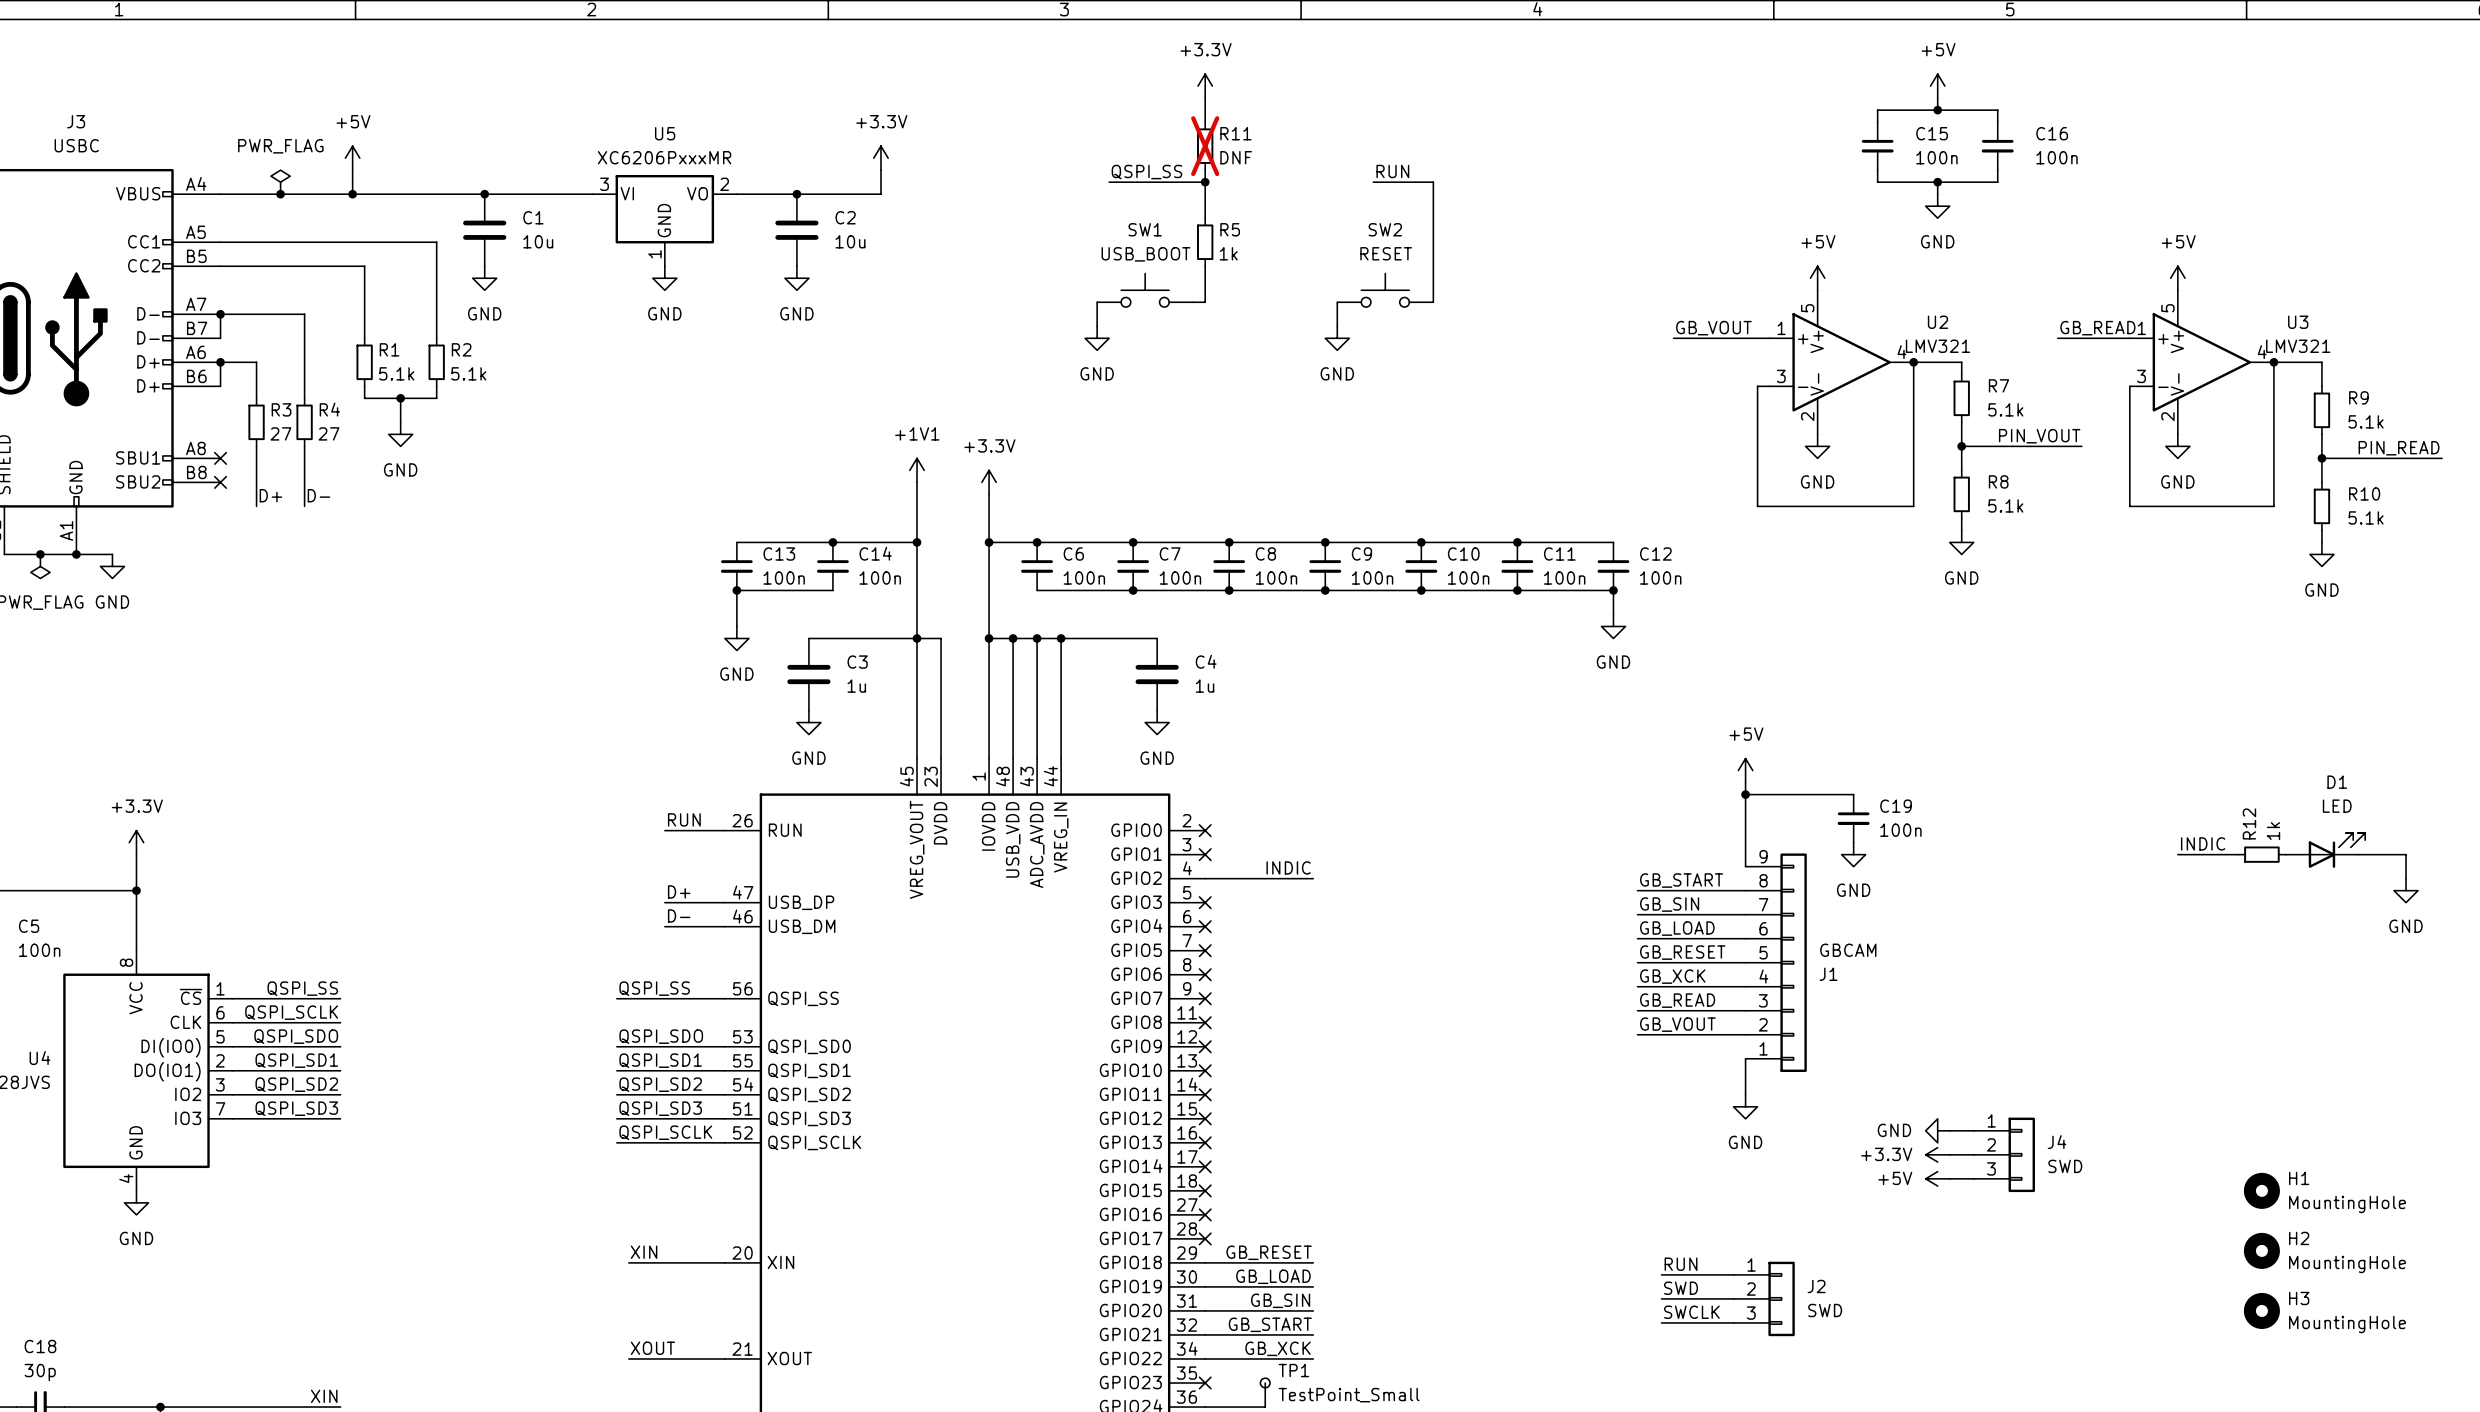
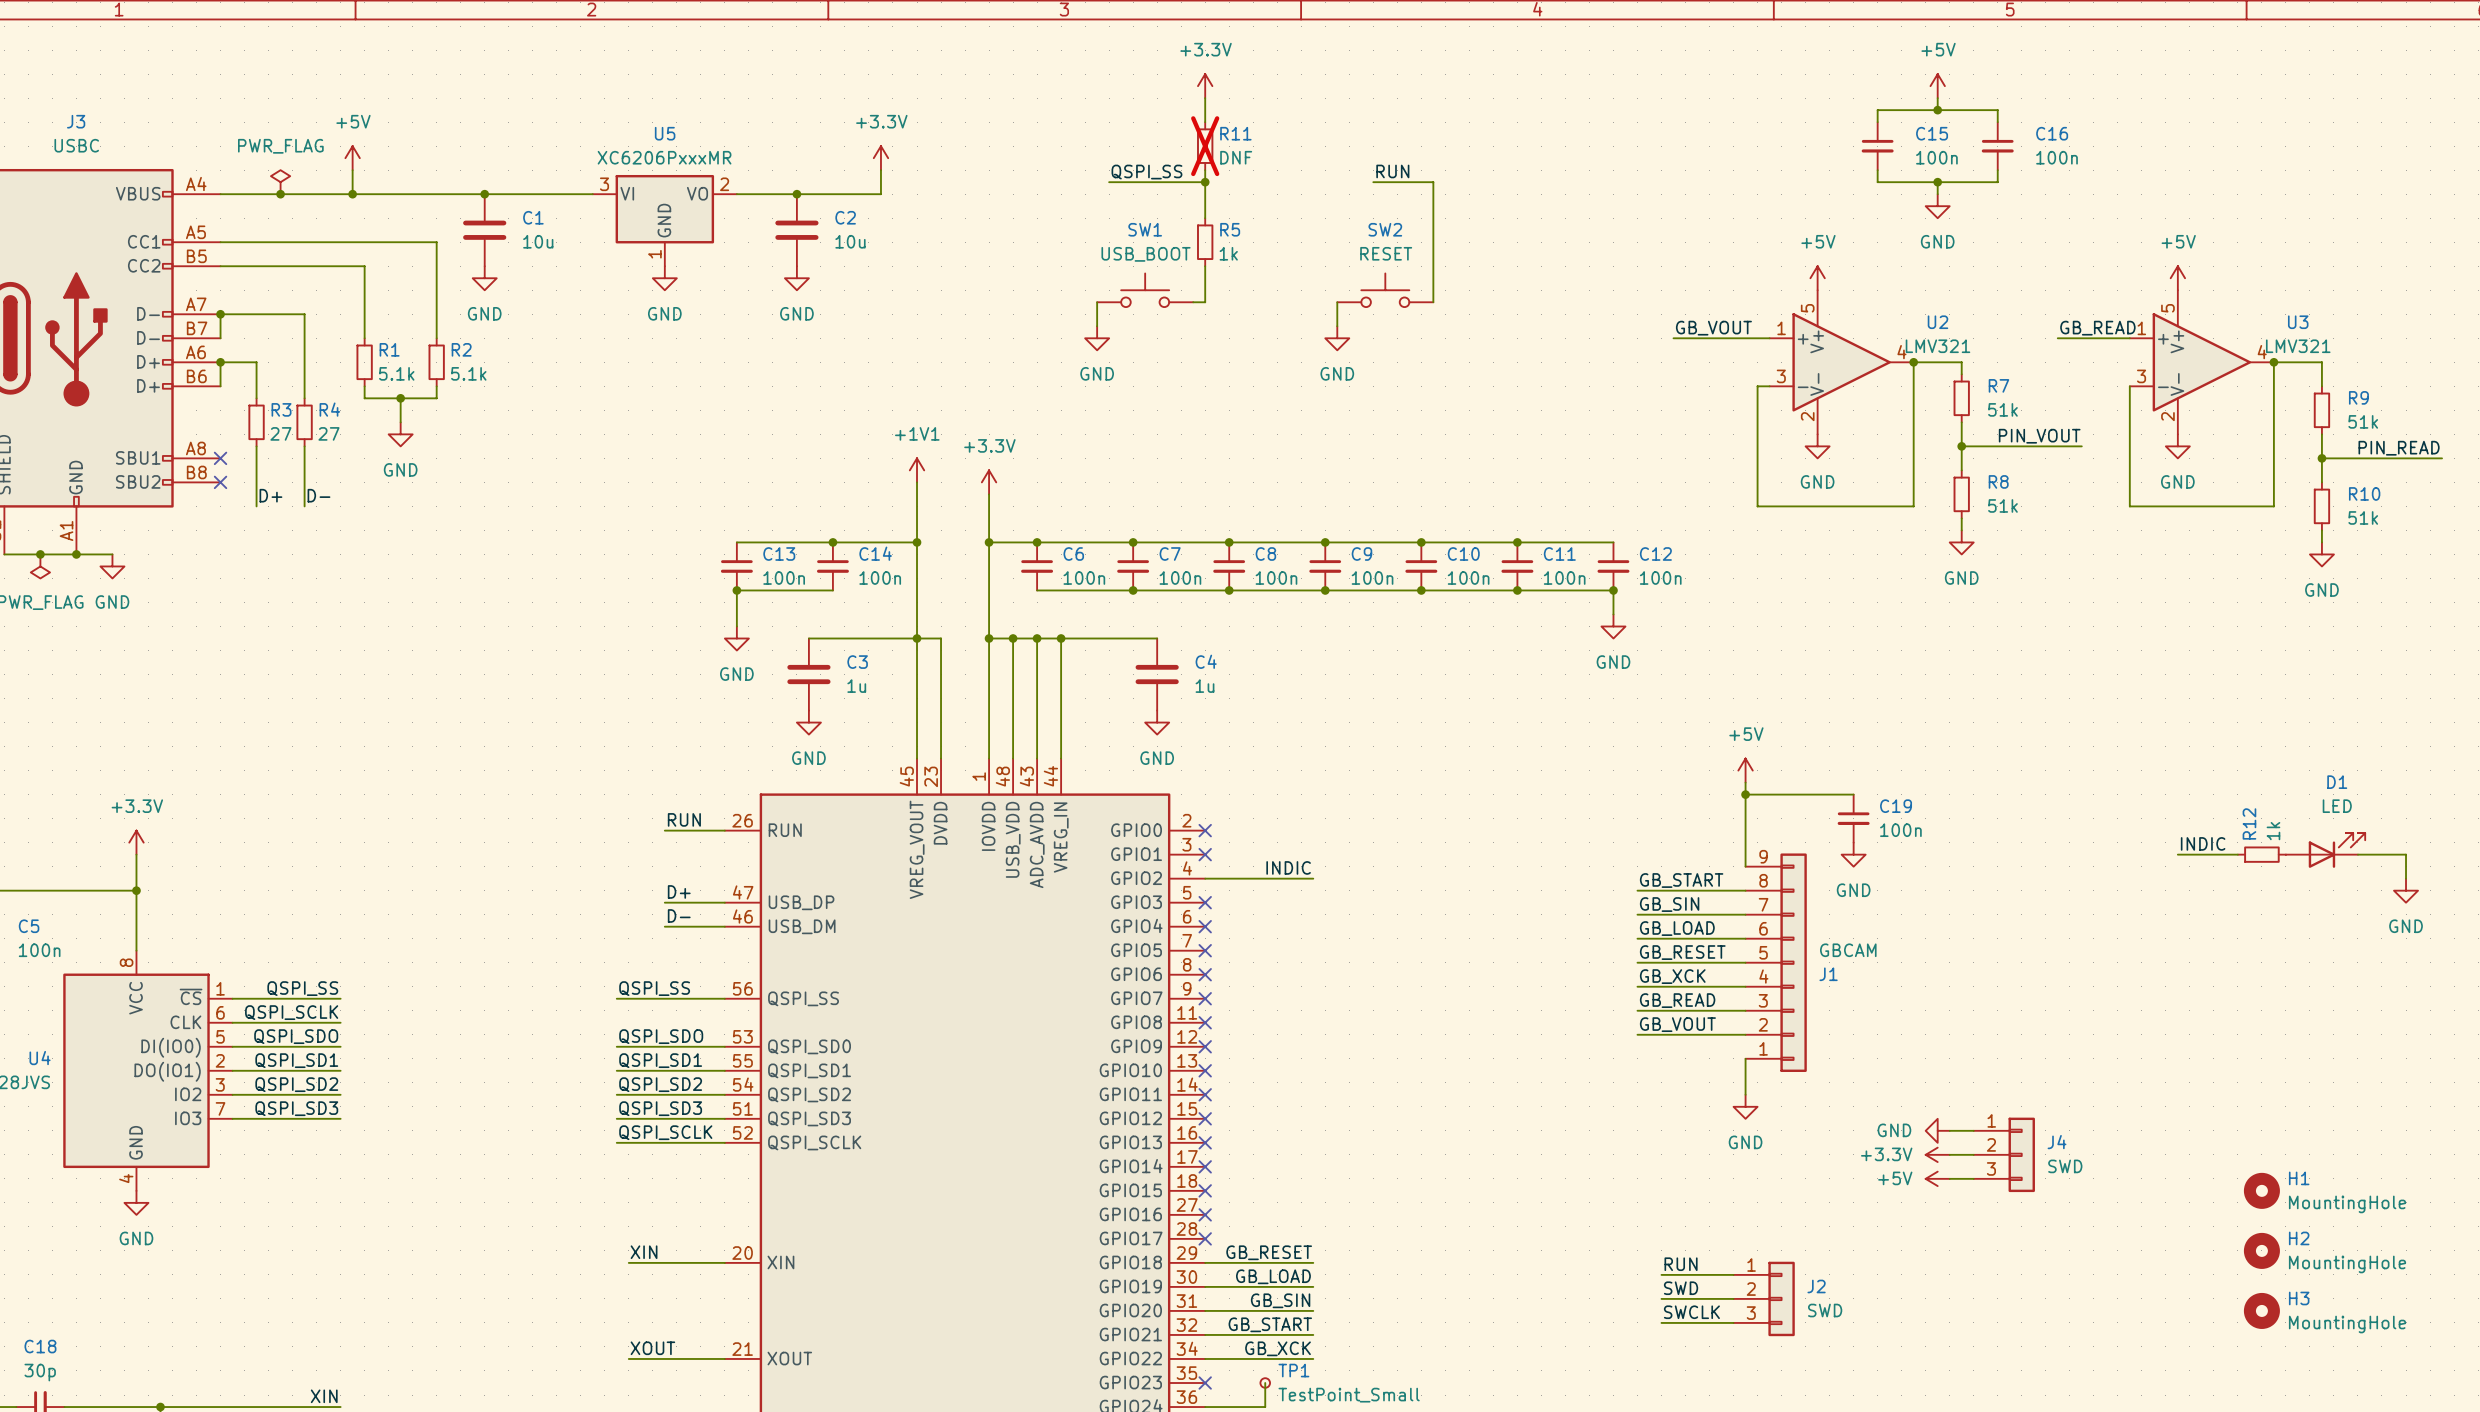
R7 value: 5.1k (2005, 409) -> 51k (2002, 409)
R9 value: 5.1k (2366, 421) -> 51k (2363, 421)
R8 value: 5.1k (2005, 505) -> 51k (2002, 505)
R10 value: 5.1k (2366, 517) -> 51k (2363, 517)

